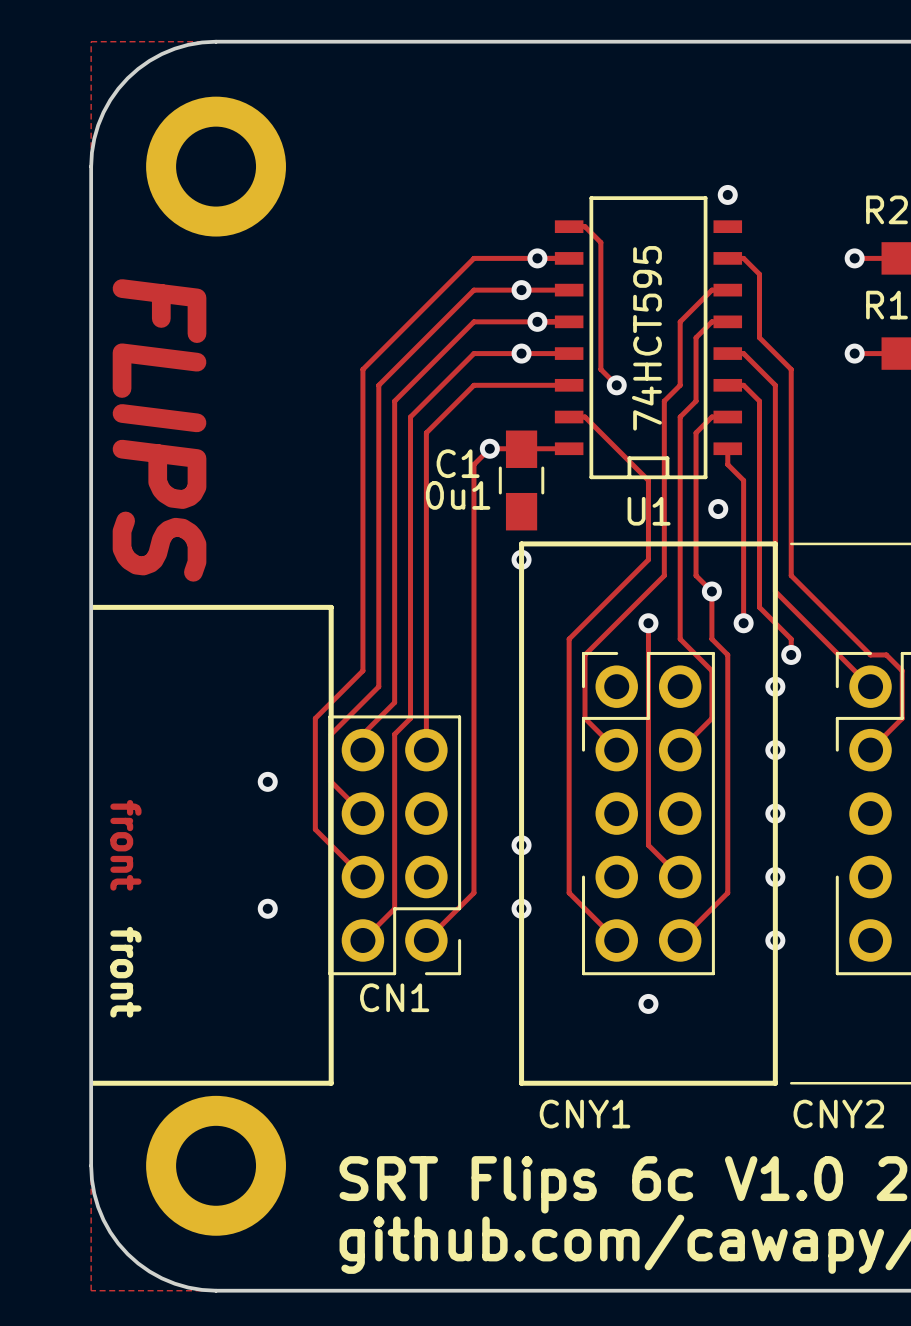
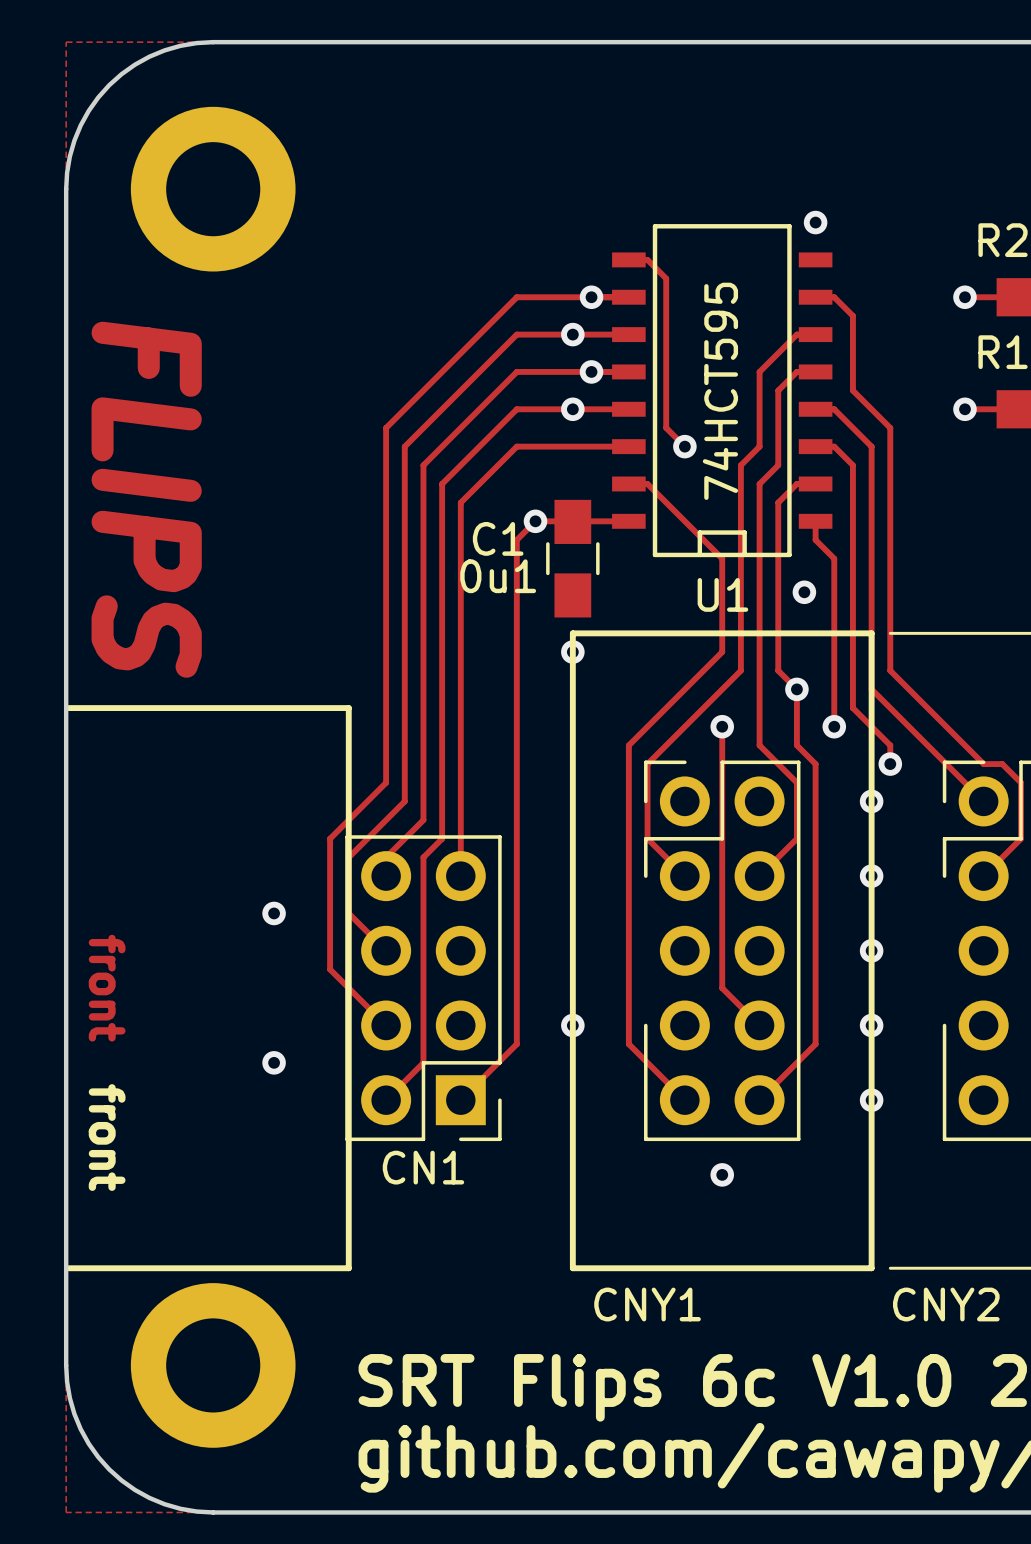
CN1 footprint: [328, 715, 462, 976] -> [345, 835, 502, 1142]
via: (521, 845) -> none
via: none -> (572, 1025)
via: (521, 908) -> none

